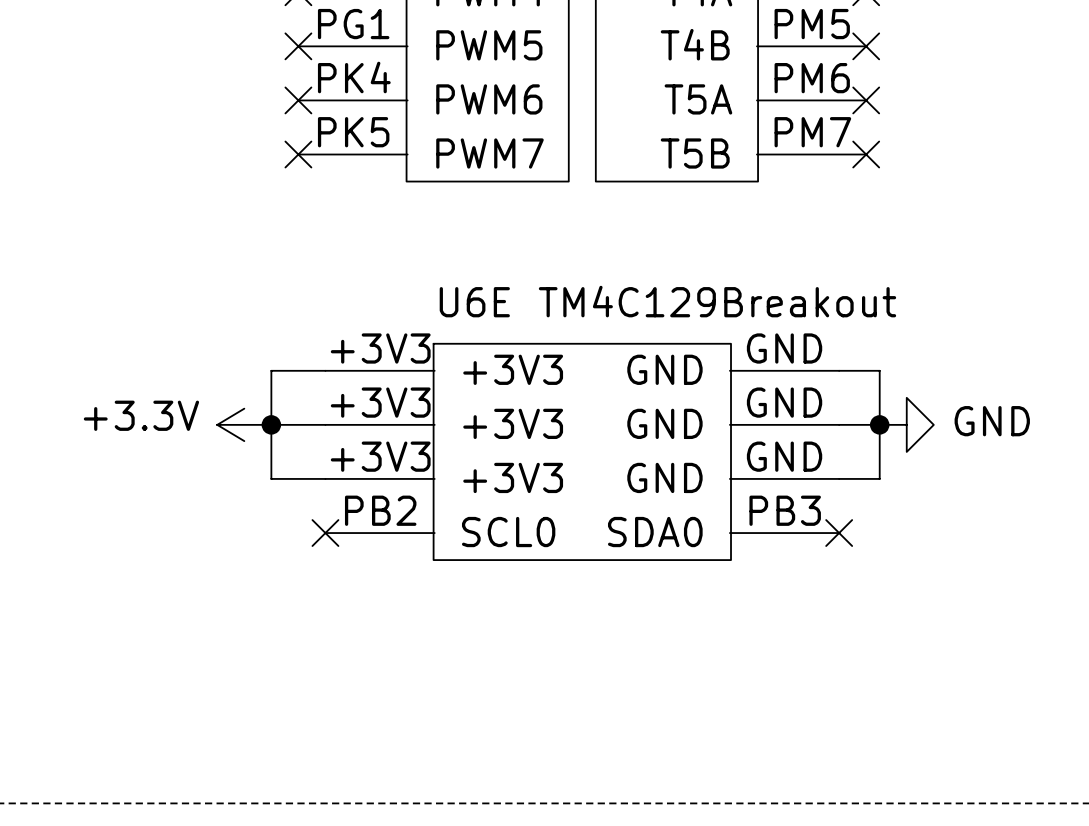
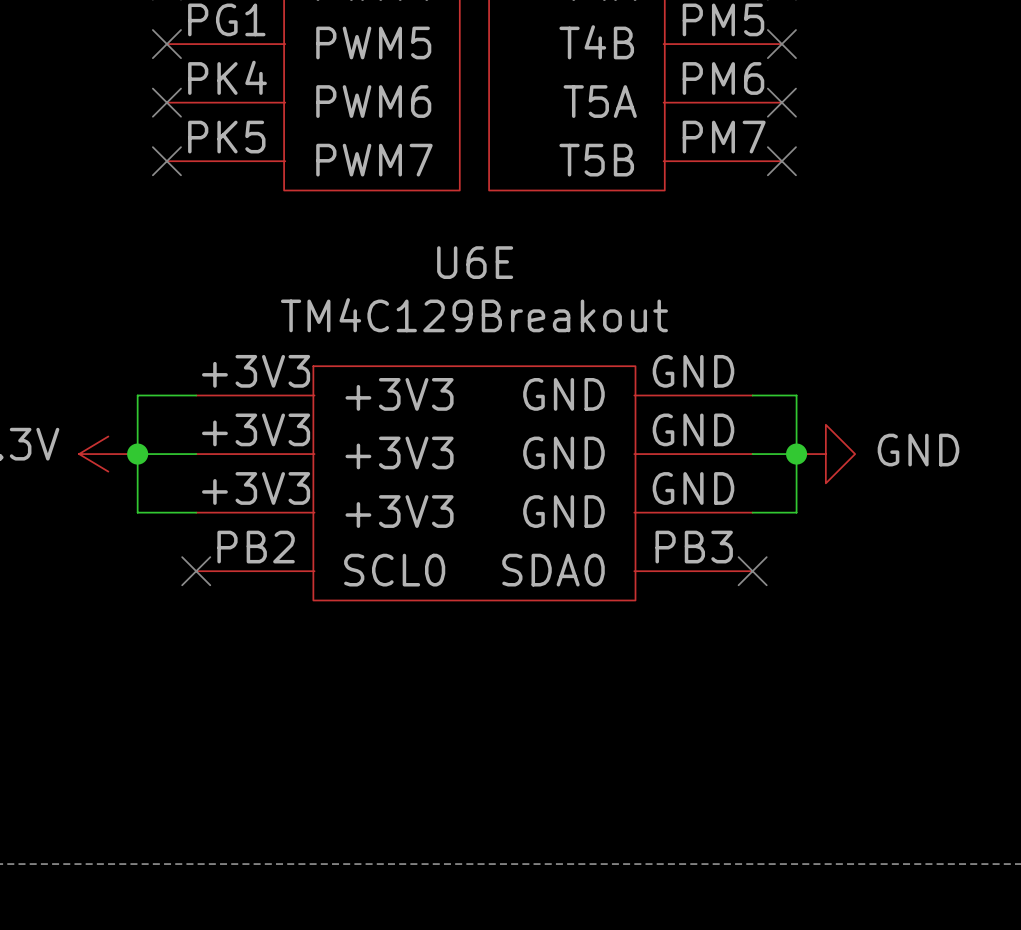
U6E value position: TM4C129Breakout (717, 301) -> TM4C129Breakout (474, 315)
U6E name position: U6E (474, 302) -> U6E (475, 262)

